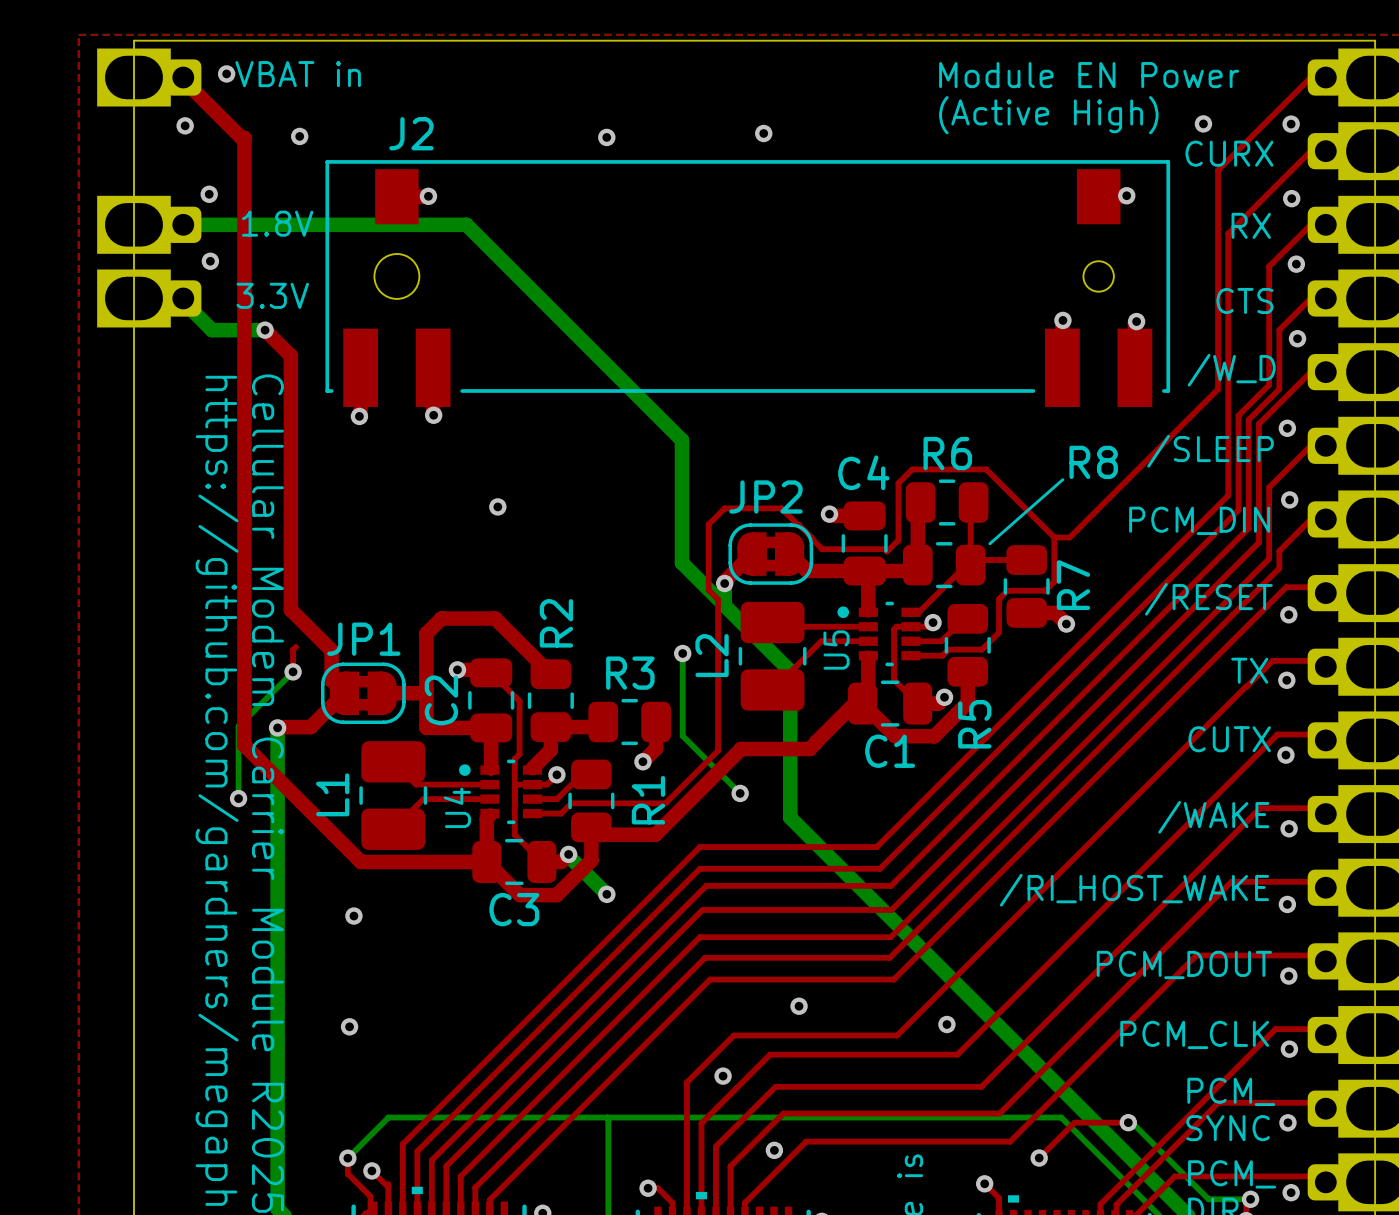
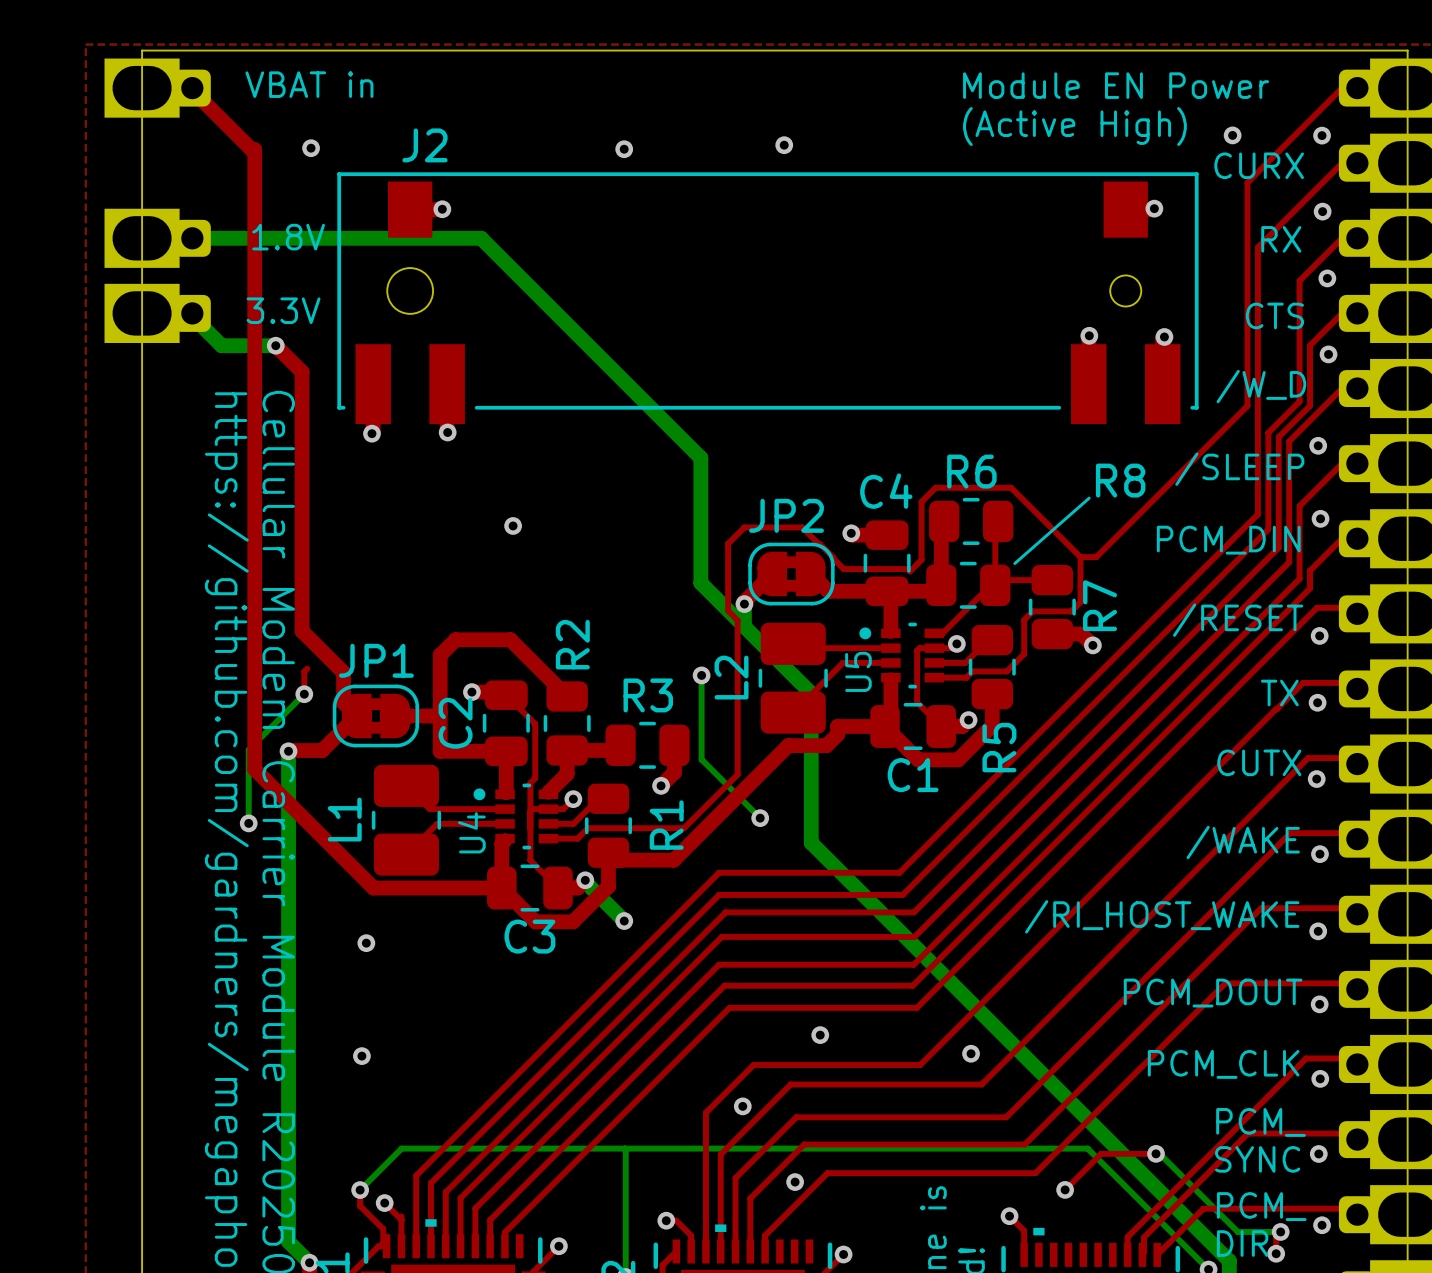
via: (226, 73) -> none
via: (185, 125) -> none
via: (209, 194) -> none
via: (210, 261) -> none
top track: (854, 703) (816, 742) -> none
top track: (816, 742) (809, 749) (741, 749) -> (876, 726) (837, 726) (837, 734) (826, 745) (788, 745) (761, 772)

